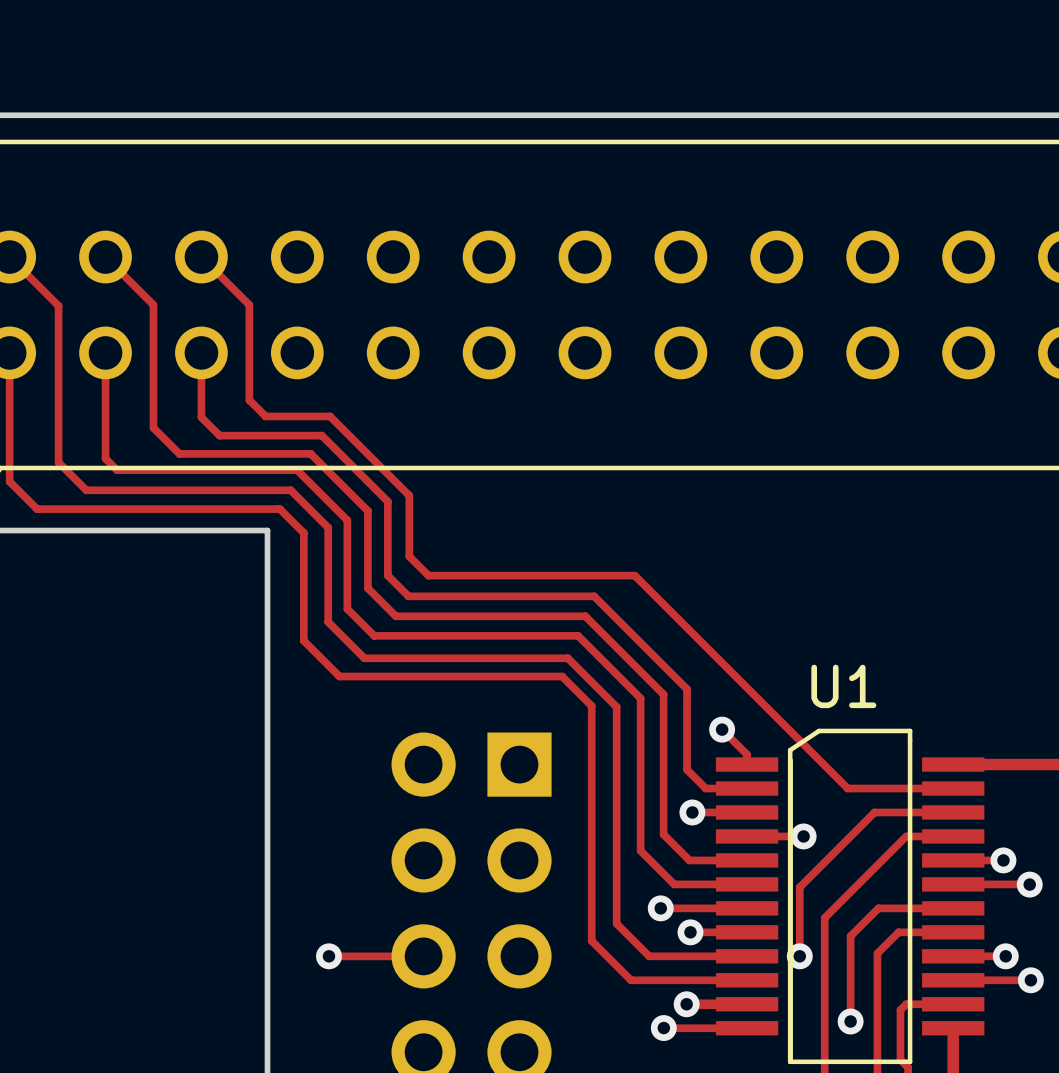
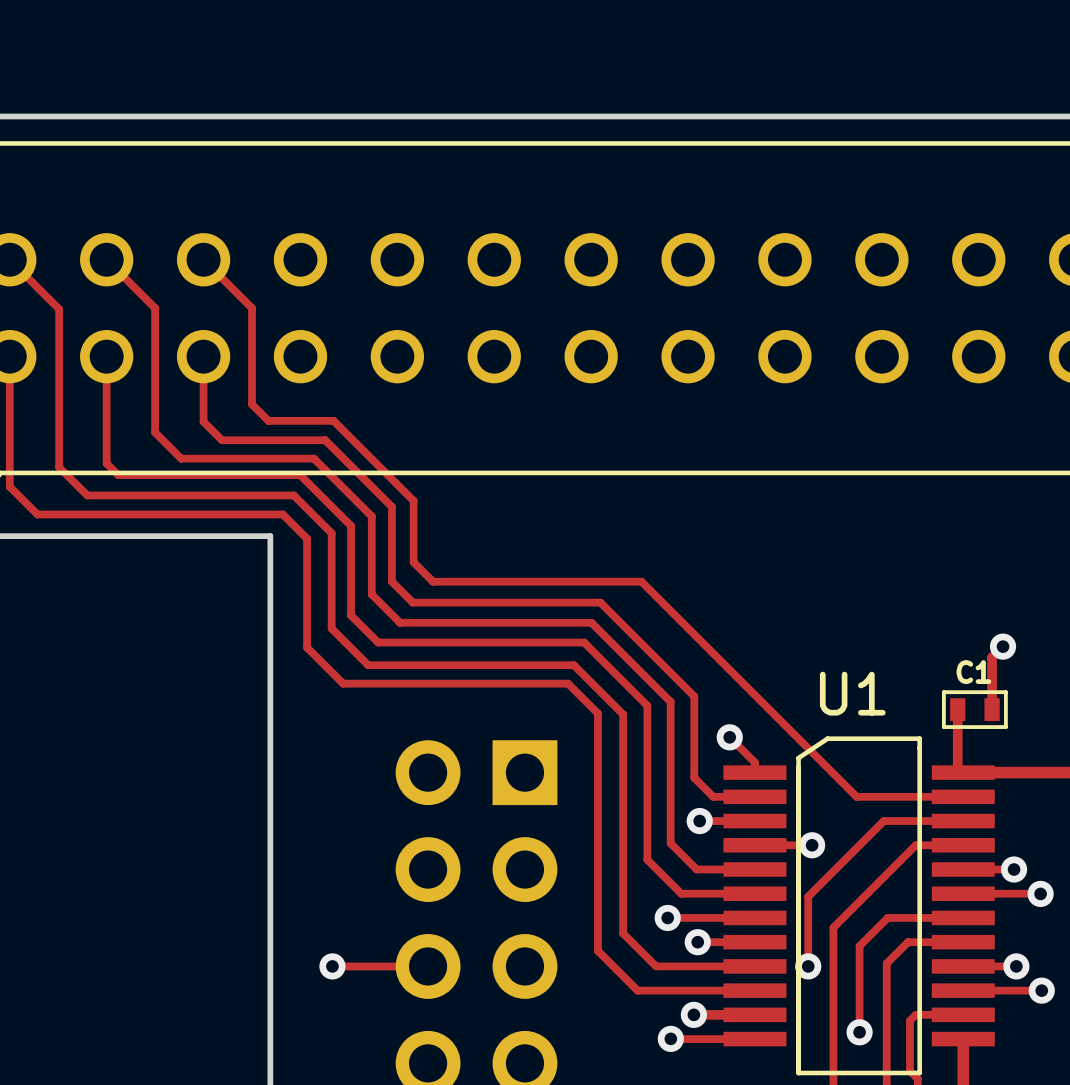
track: none -> (1003, 646) (992, 657) (992, 709)
via: none -> (1003, 646)
track: none -> (957, 709) (957, 767) (963, 772)
C1: none -> (974, 709)

